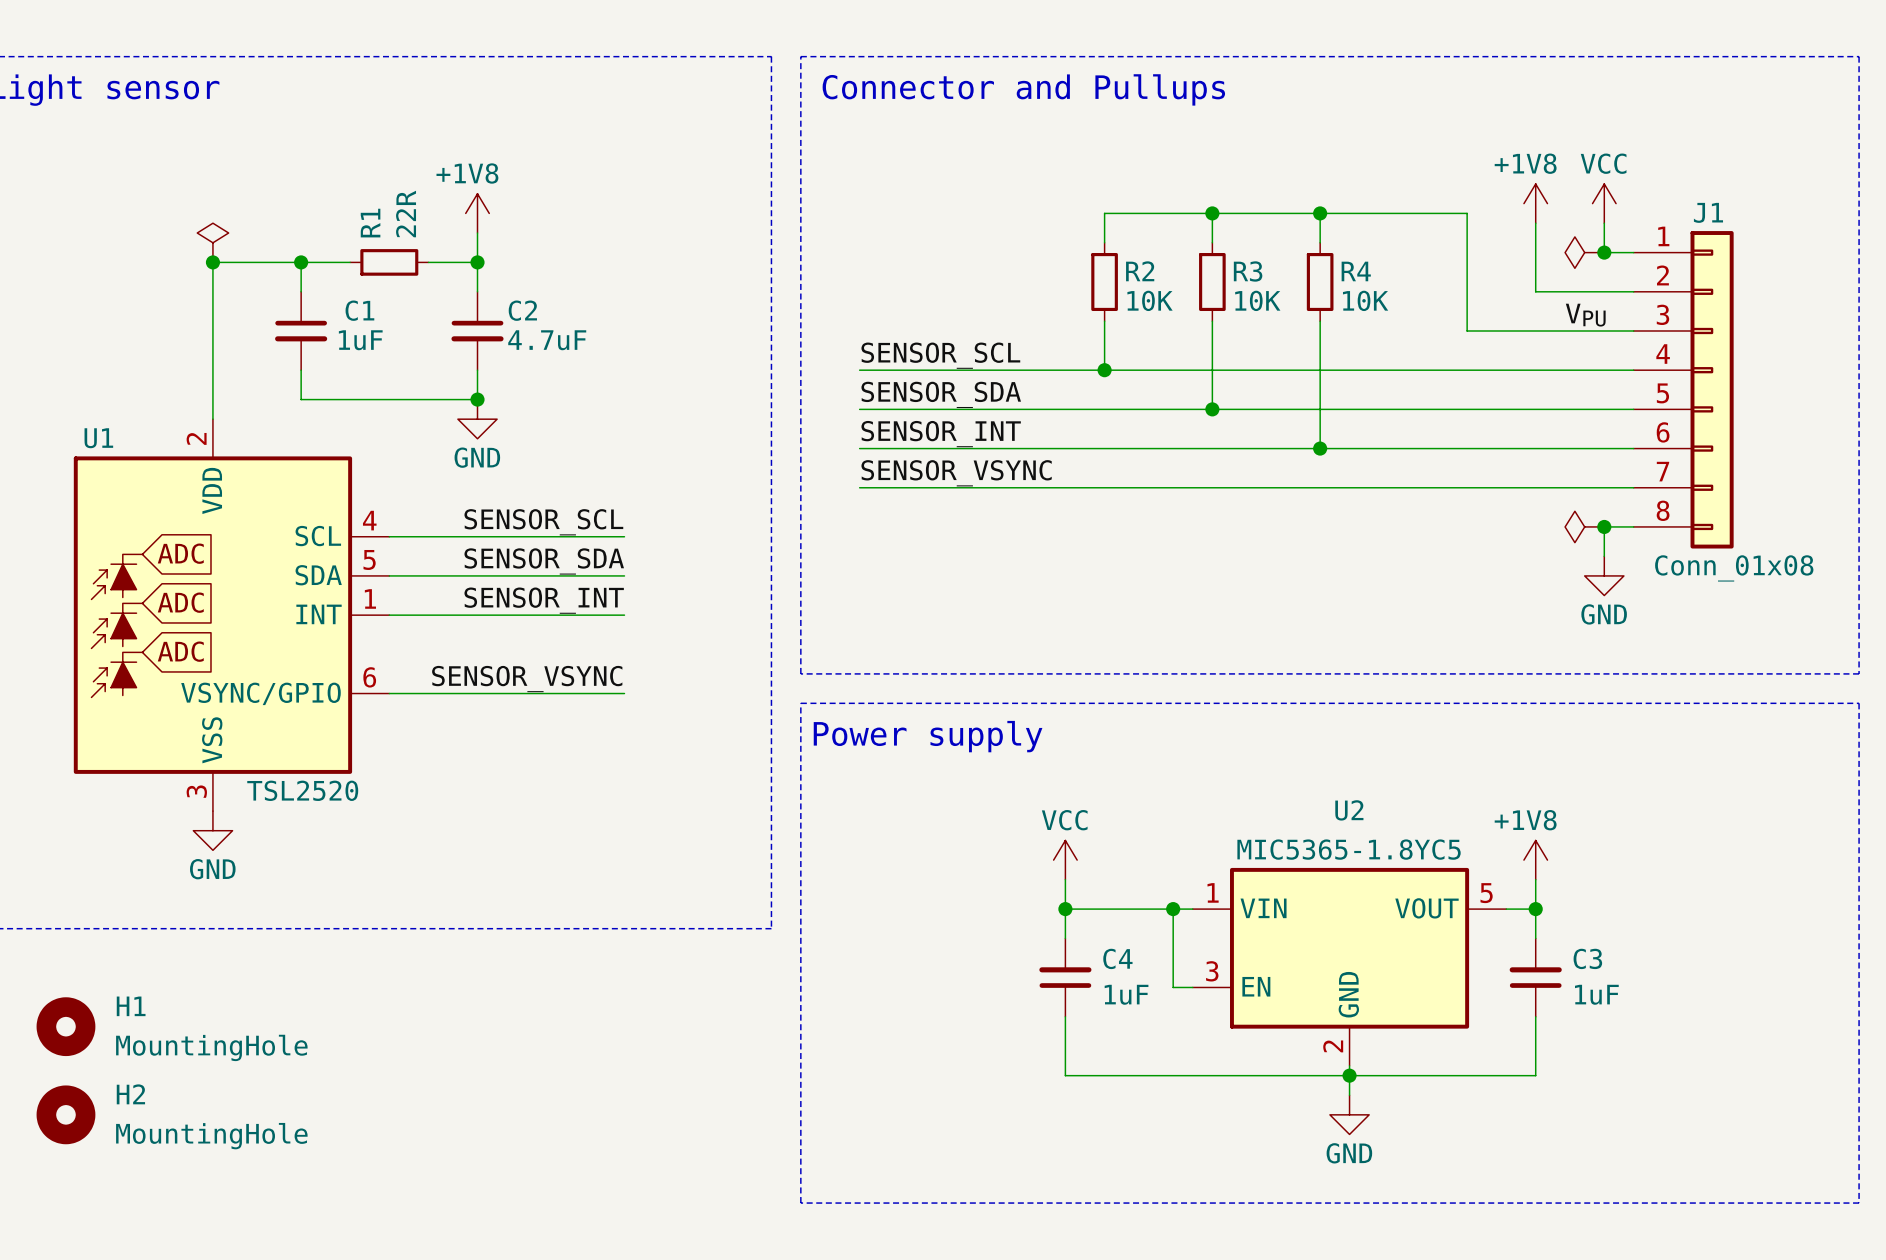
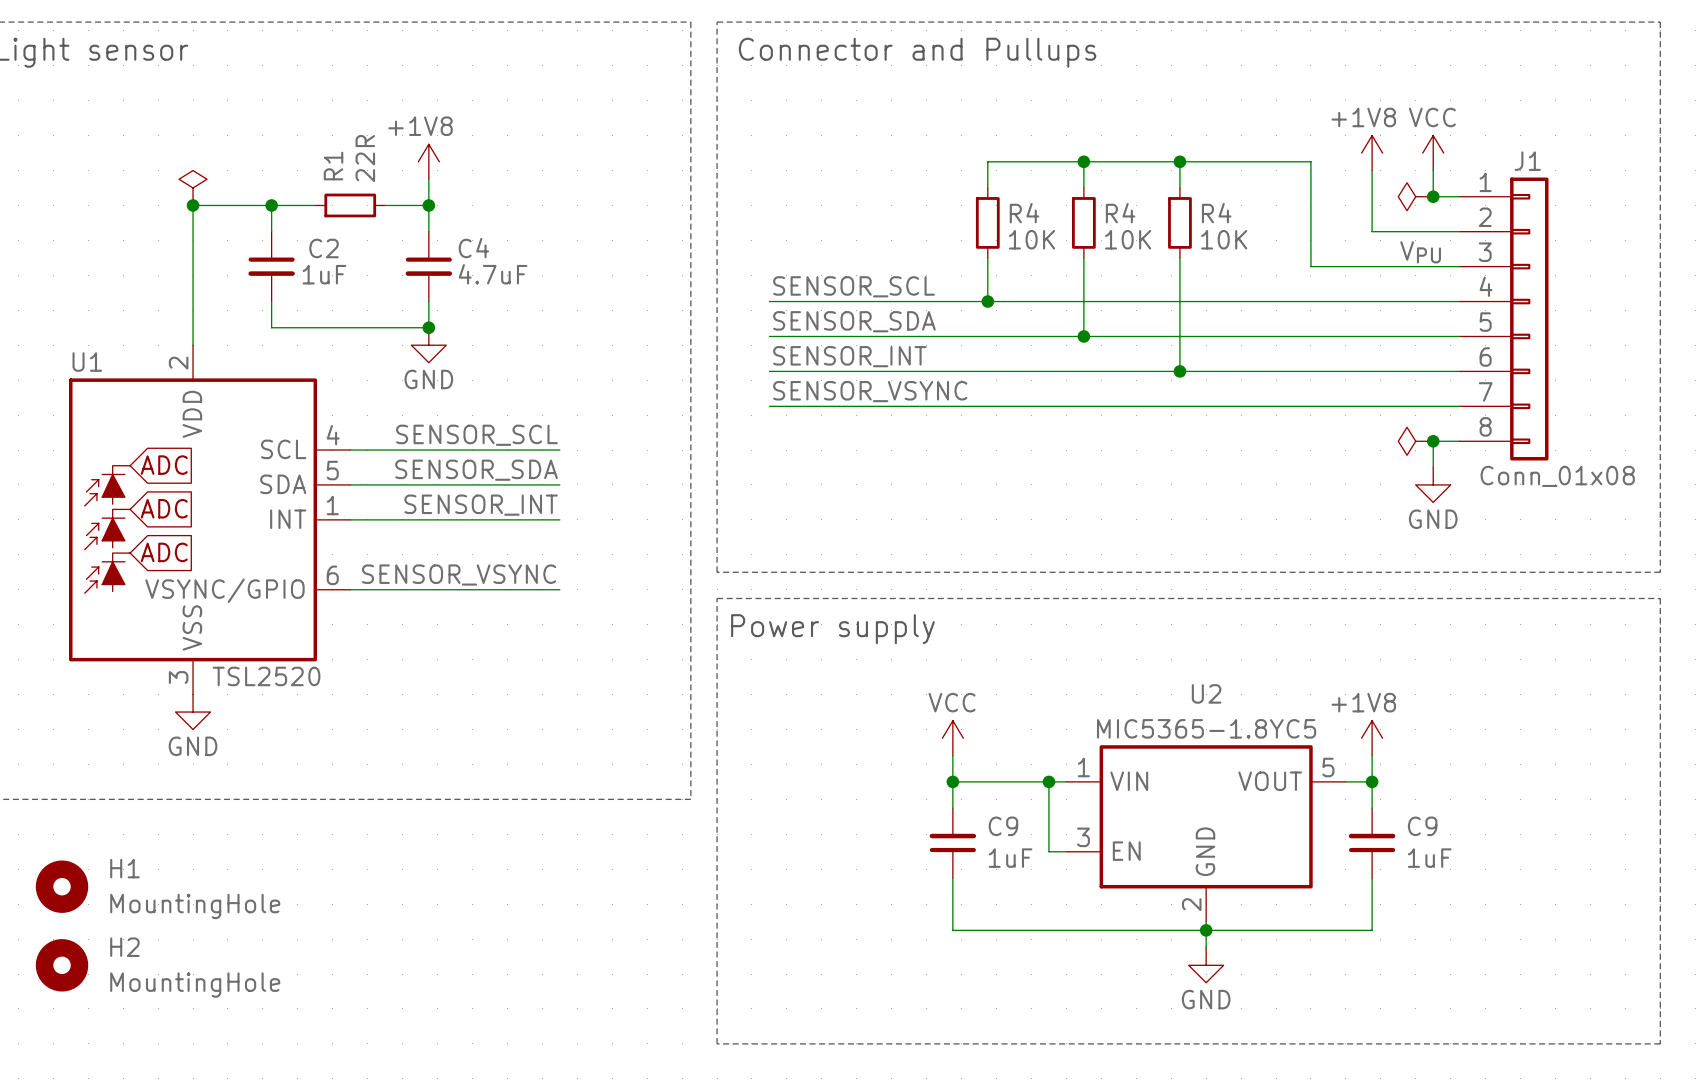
R2 name: R2 (1140, 271) -> R4 (1024, 213)
R3 name: R3 (1248, 271) -> R4 (1120, 213)
C1 name: C1 (359, 310) -> C2 (324, 248)
C2 name: C2 (522, 310) -> C4 (473, 248)
C4 name: C4 (1117, 958) -> C9 (1003, 826)
C3 name: C3 (1587, 958) -> C9 (1422, 826)

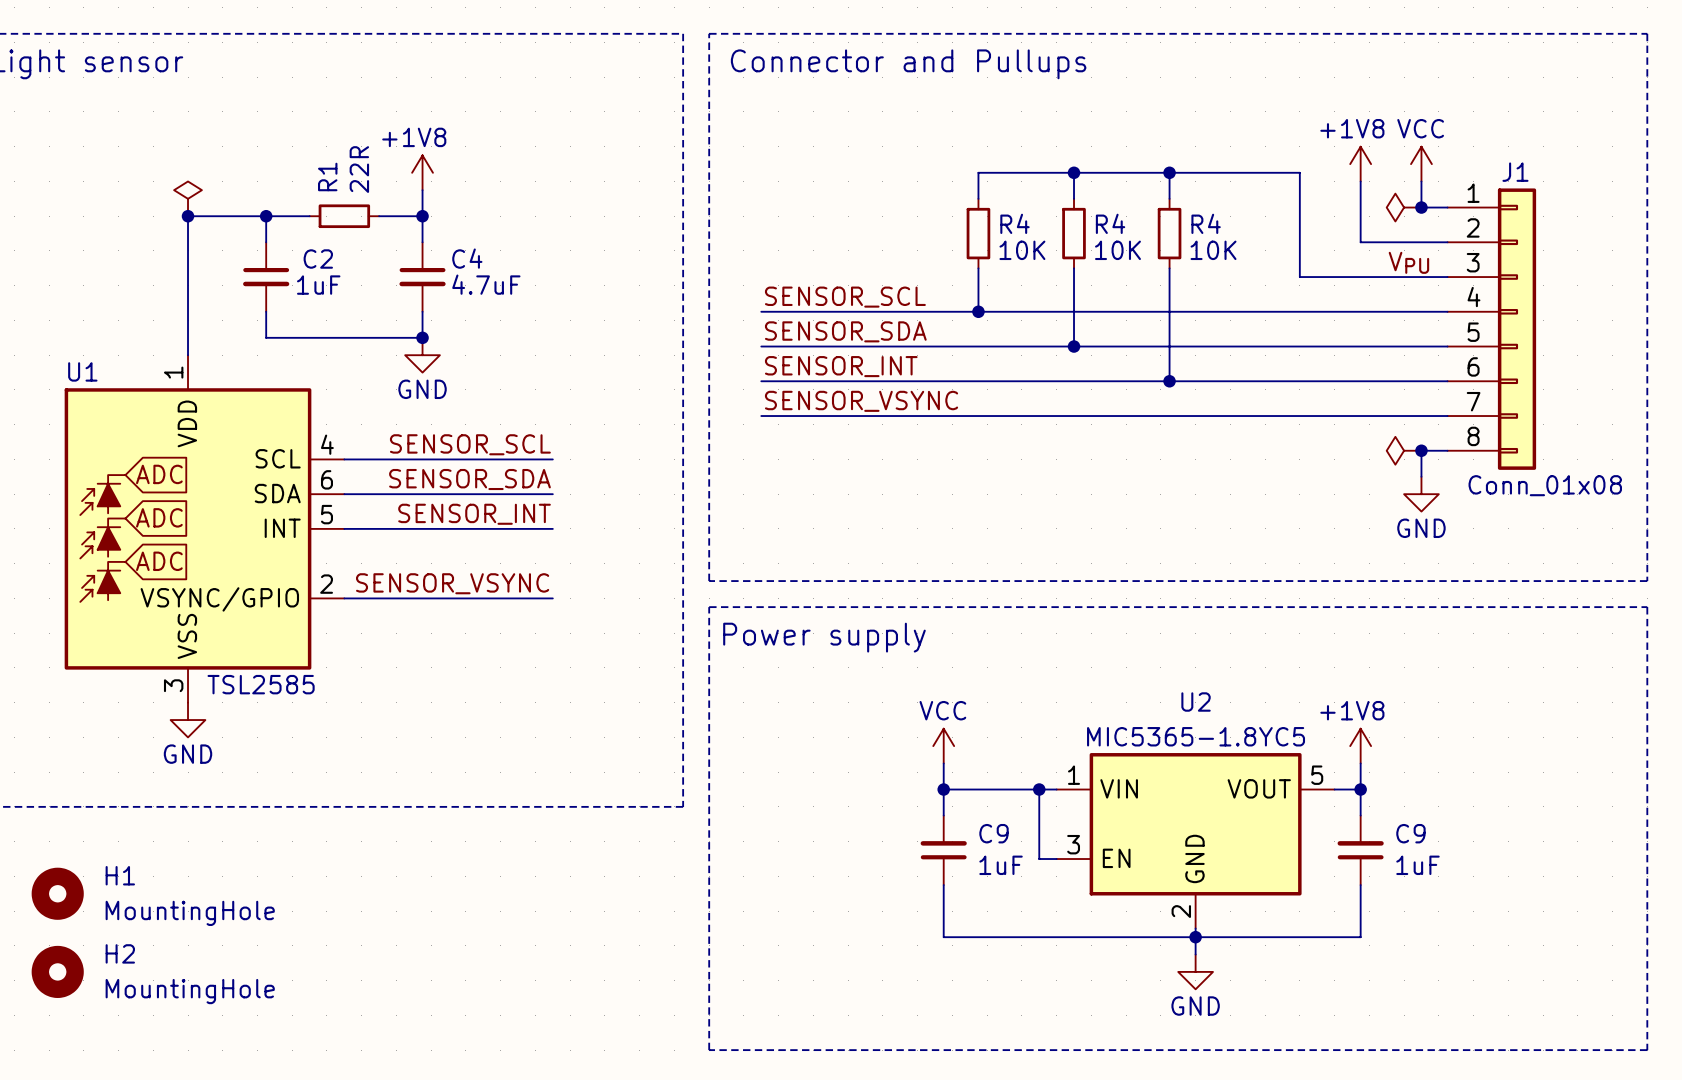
U1 pin number: 2 (178, 363) -> 1 (173, 372)
U1 pin number: 5 (332, 470) -> 6 (326, 479)
U1 pin number: 1 (332, 505) -> 5 (326, 514)
U1 pin number: 6 (332, 575) -> 2 (326, 584)
U1 value: TSL2520 (266, 676) -> TSL2585 (261, 684)

